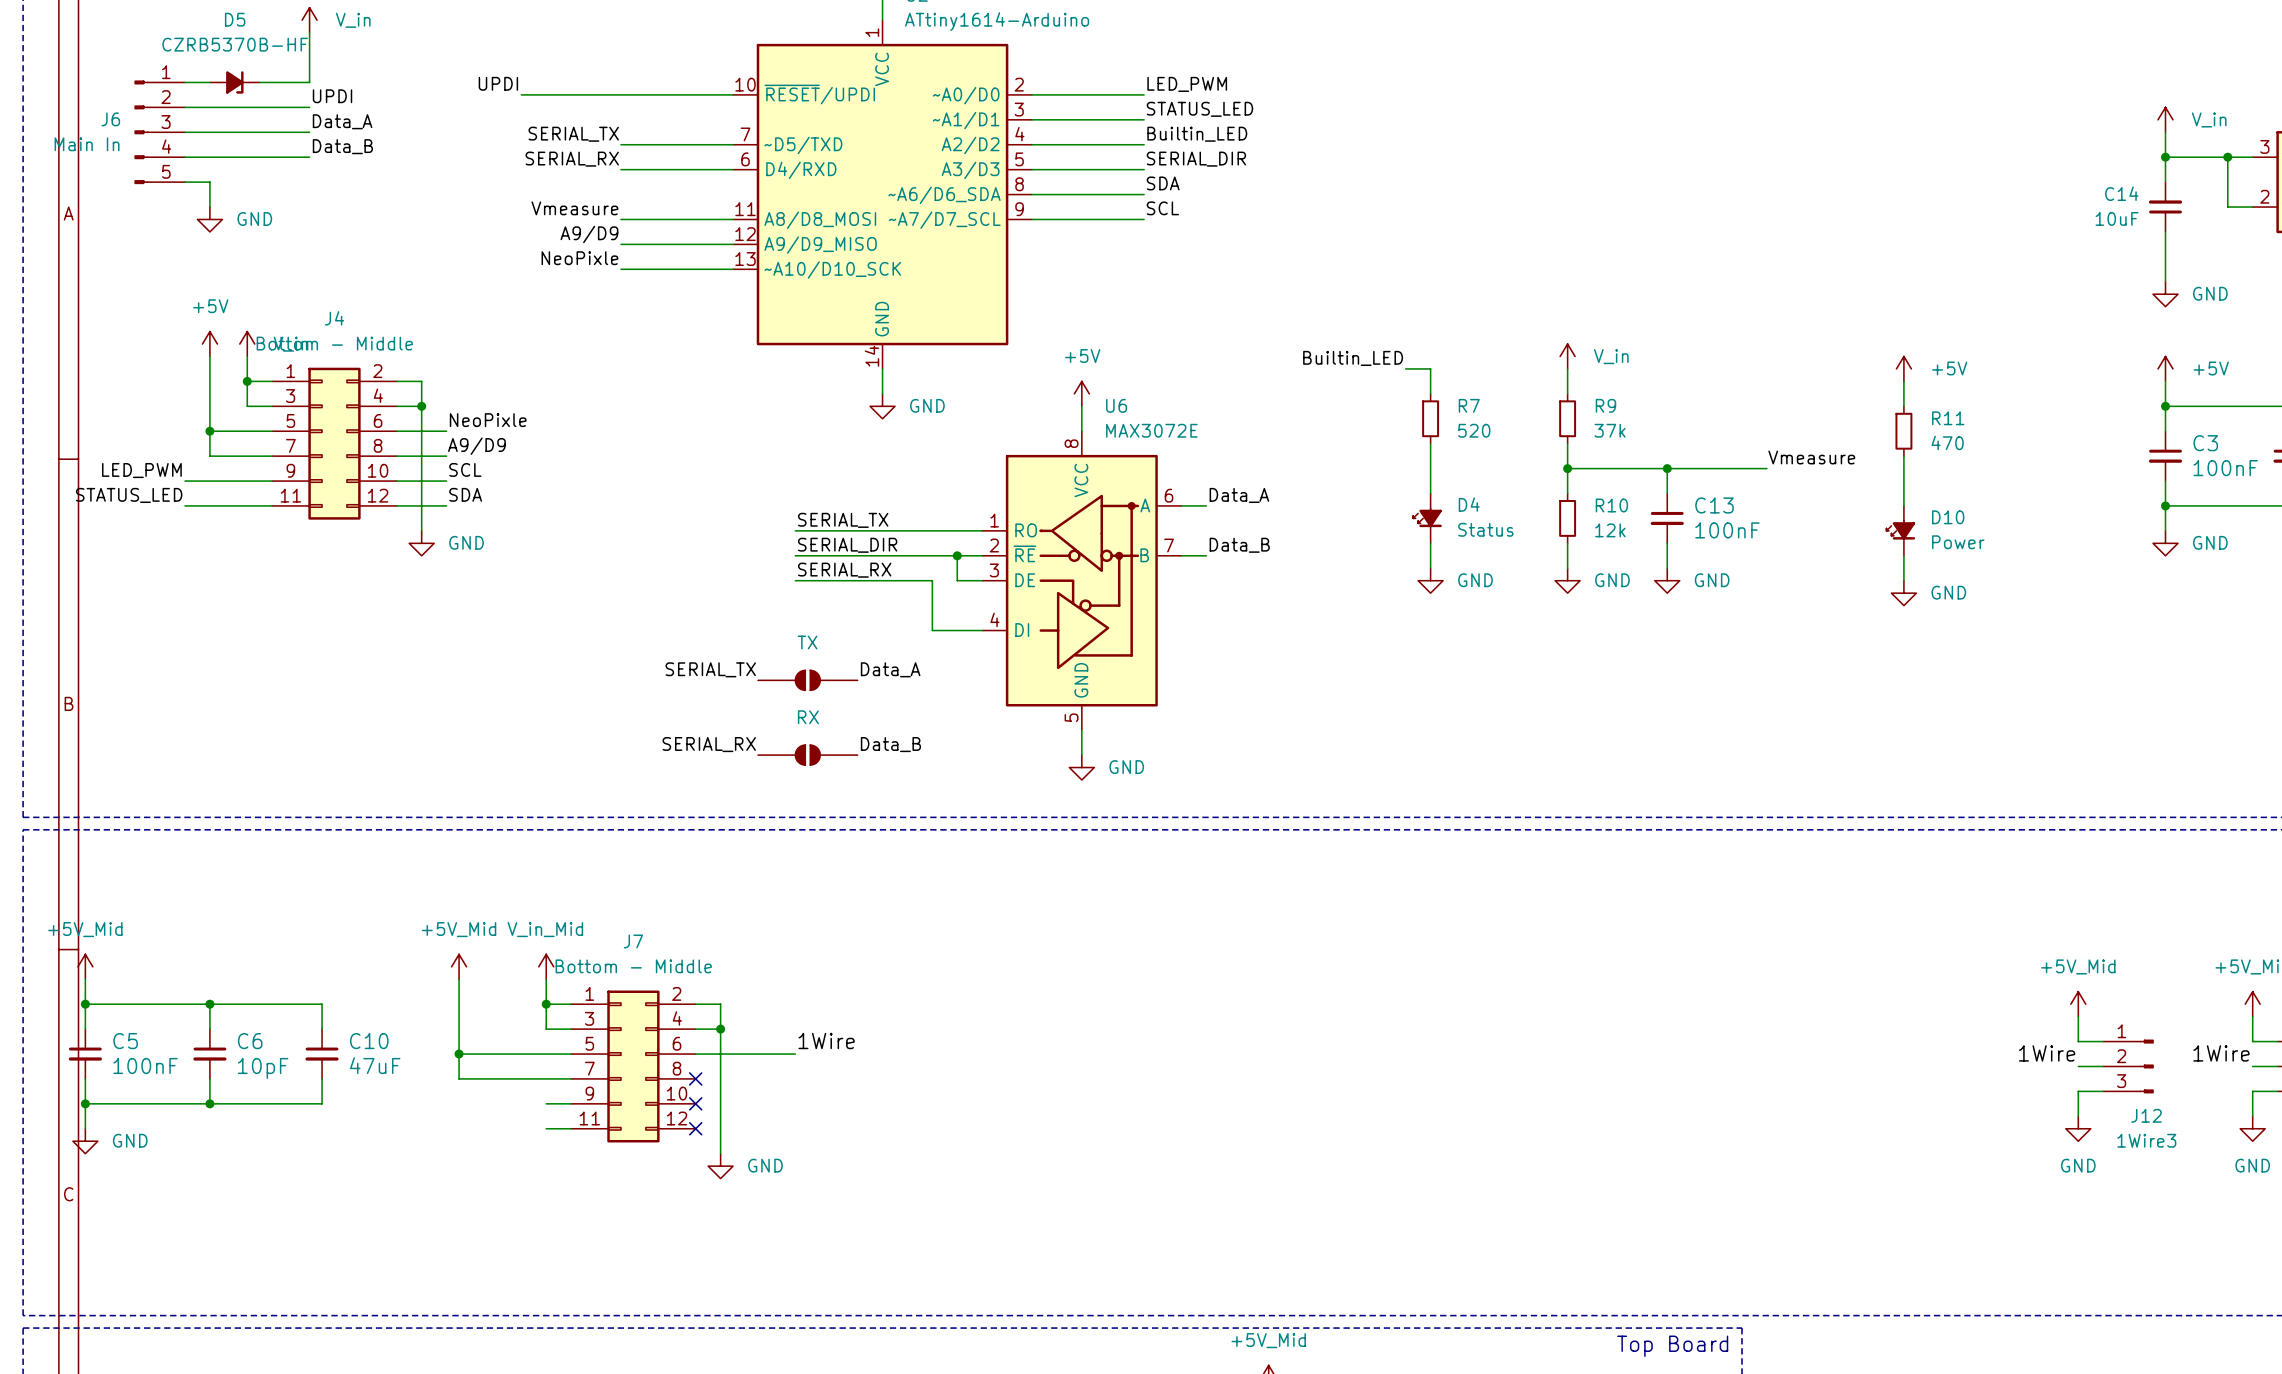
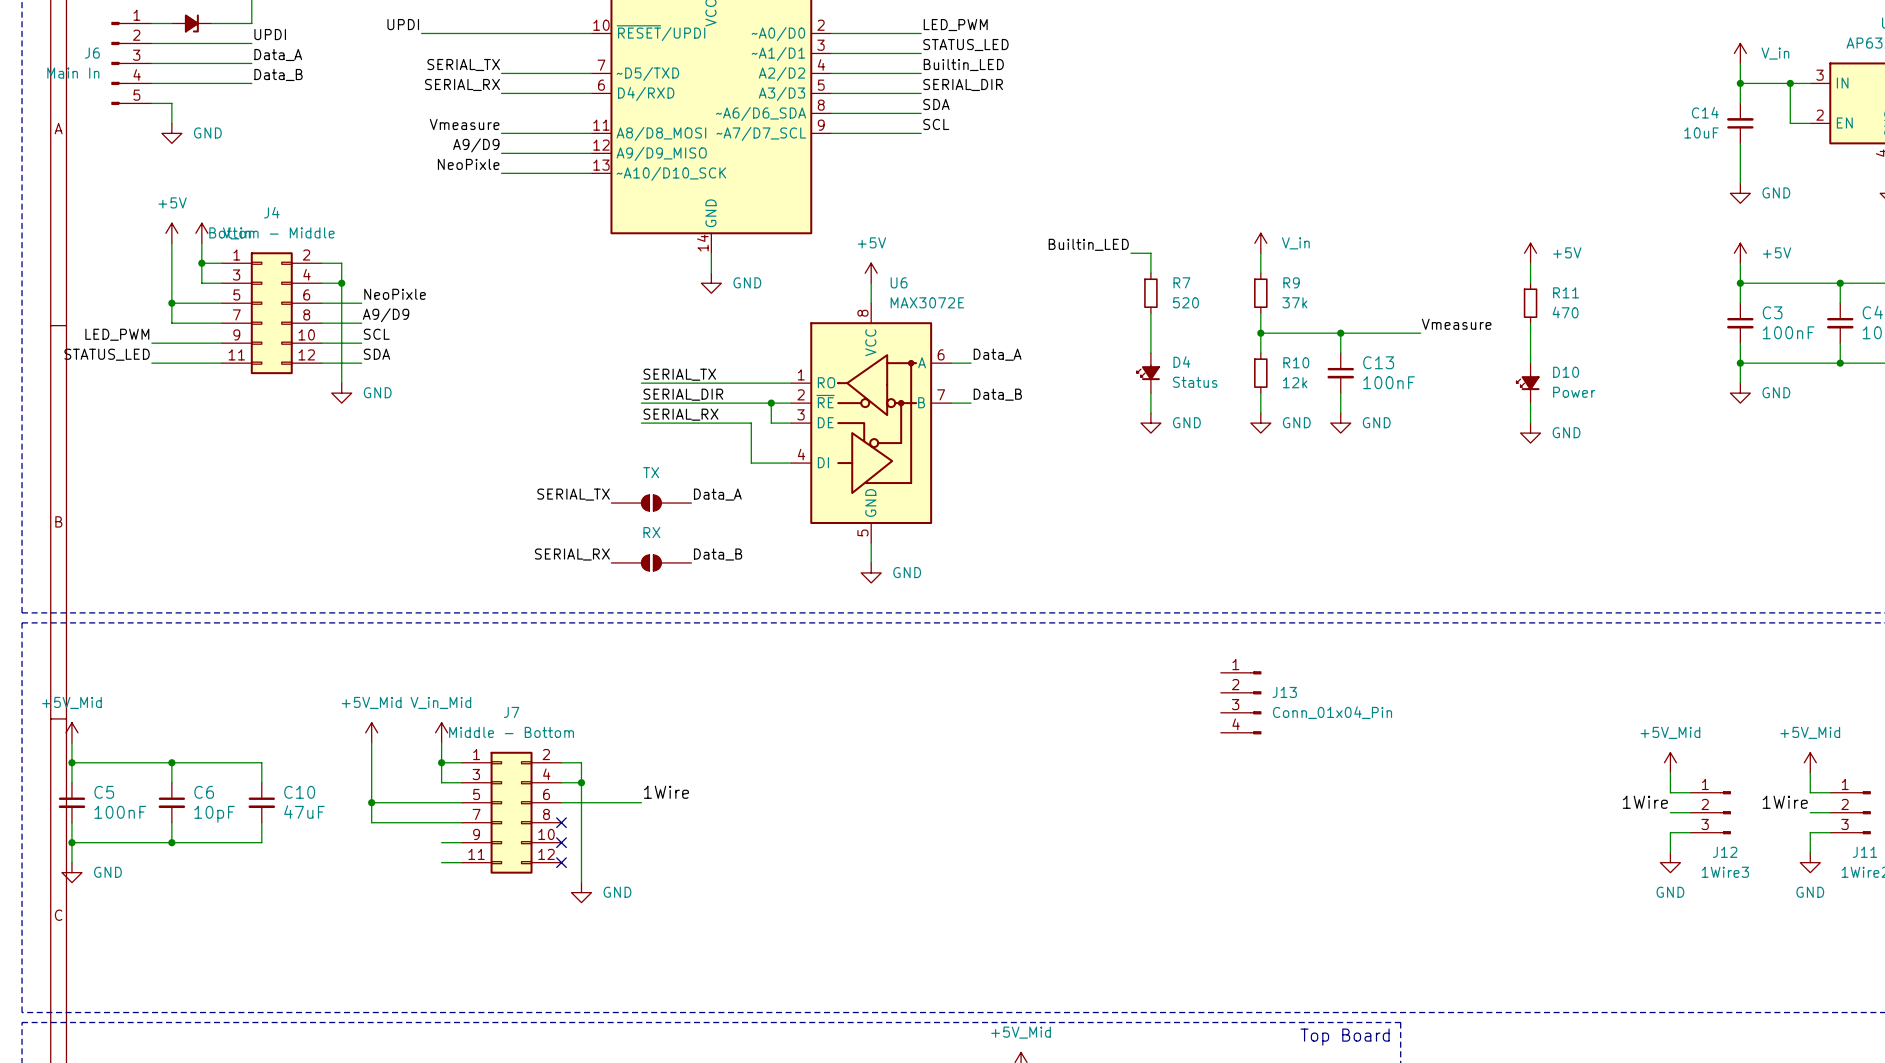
J13: none -> Conn_01x04_Pin (1241, 702)
J7 value: Bottom - Middle (633, 966) -> Middle - Bottom (511, 732)

